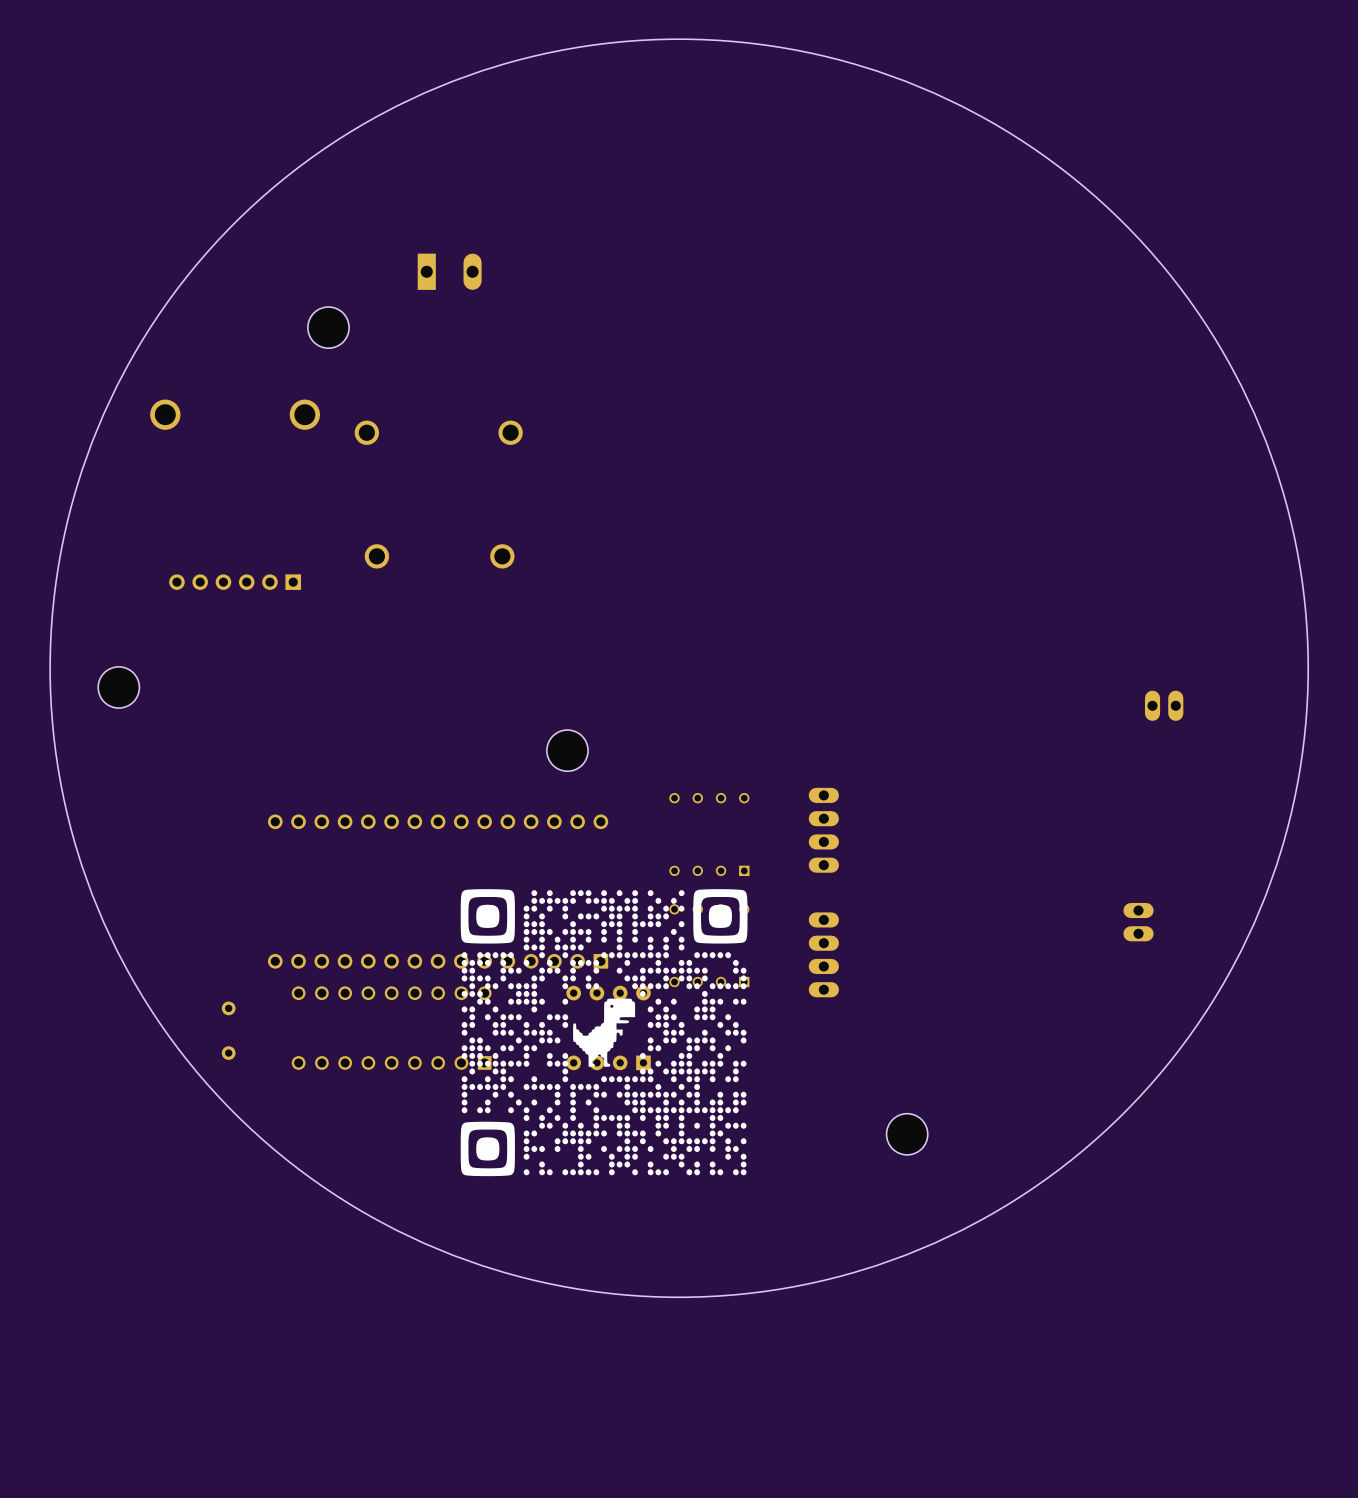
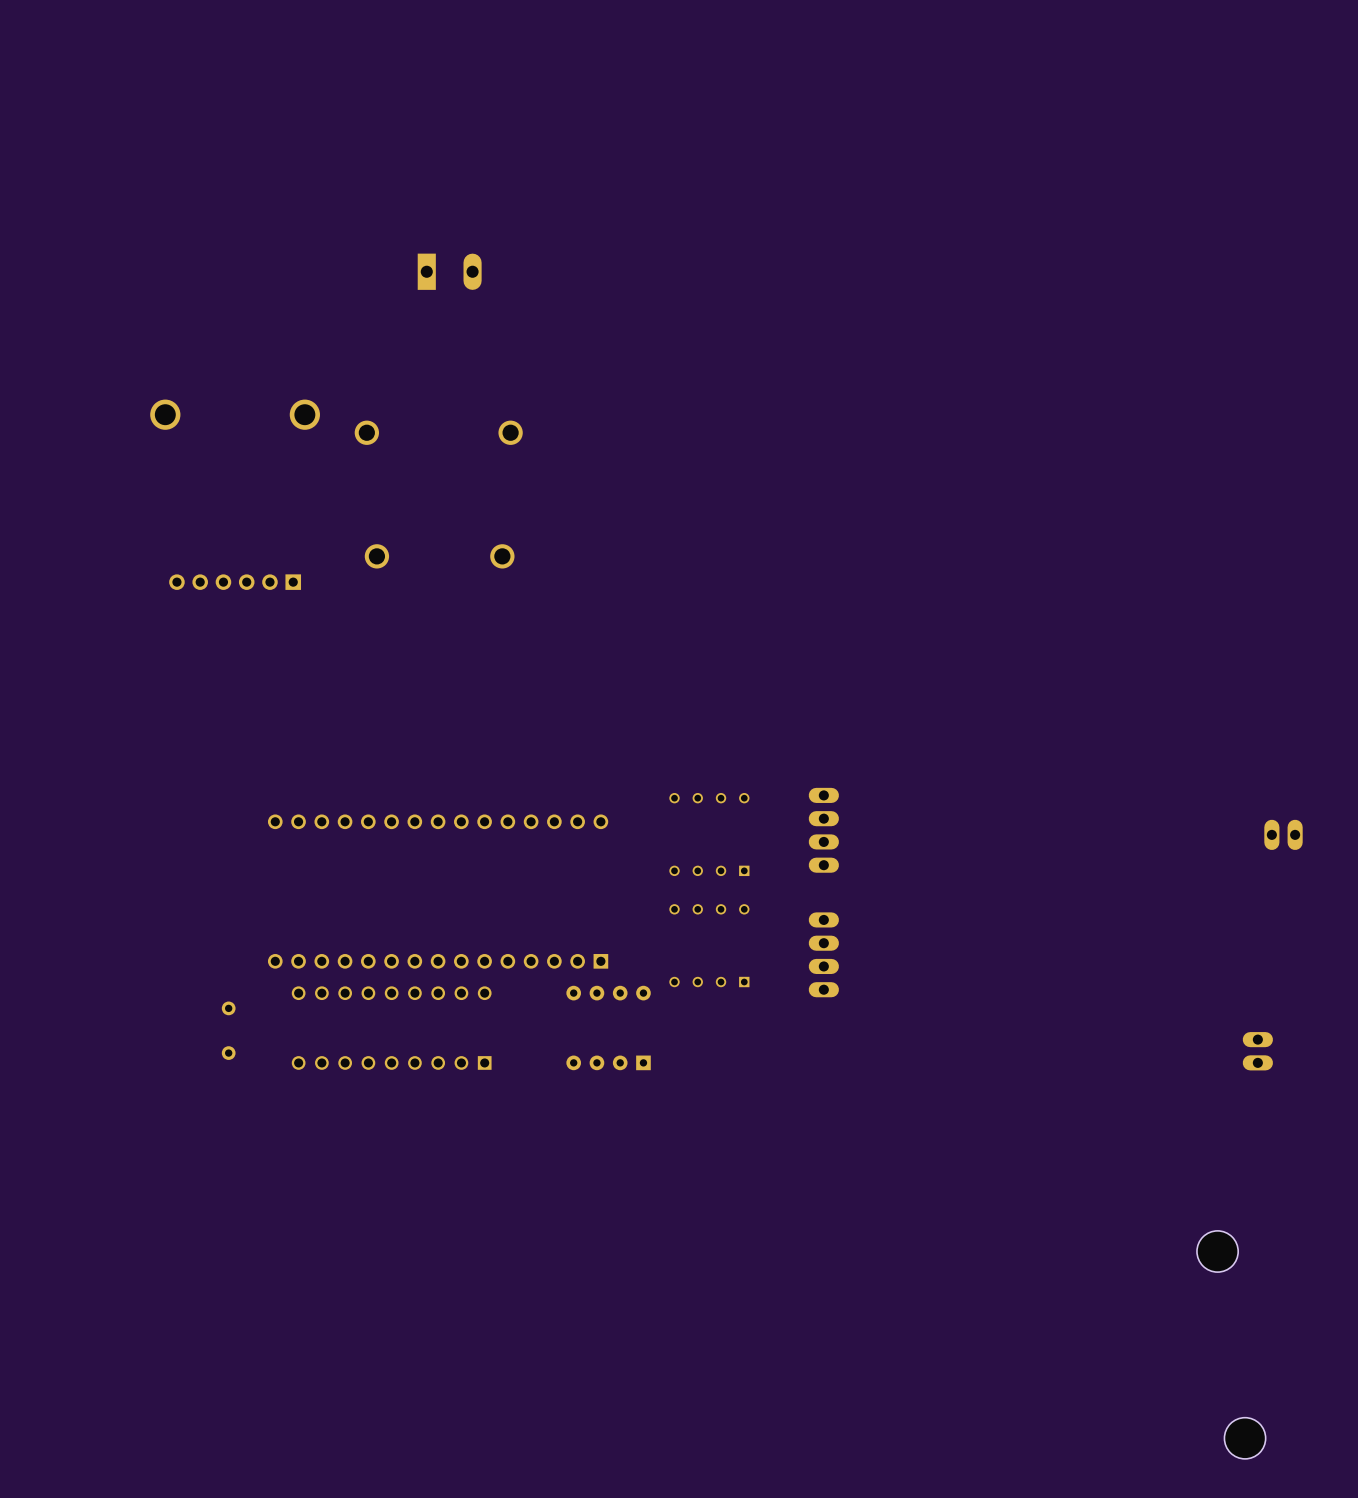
round board edge: [49, 38, 1309, 1298] -> none
part: (328, 327) -> none
part: (118, 687) -> none
part: (1164, 705) -> none
part: (567, 750) -> none
part: none -> (1283, 834)
drawing: [460, 889, 748, 1177] -> none
part: (1138, 922) -> none
part: none -> (1257, 1051)
part: (907, 1134) -> none
part: none -> (1217, 1251)
part: none -> (1245, 1438)

